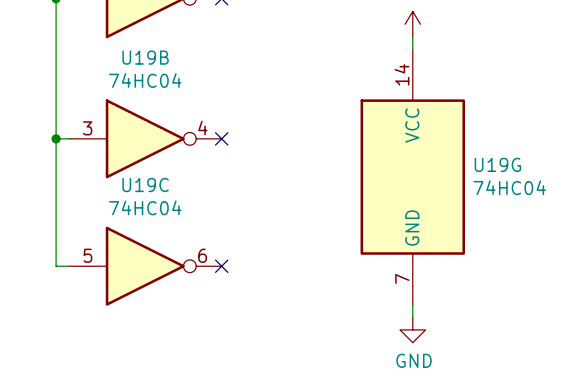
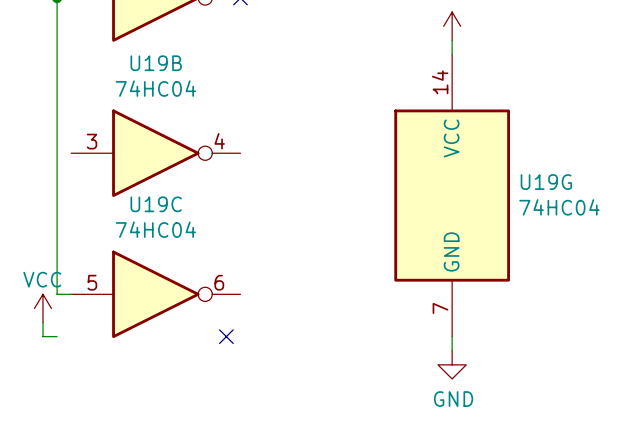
wire: (56, 138) (68, 138) -> none
junction: (56, 138) -> none
no-connect mark: (221, 138) -> none
no-connect mark position: (221, 266) -> (226, 336)
power symbol: none -> VCC (42, 308)
wire: none -> (42, 322) (42, 336) (57, 336)

